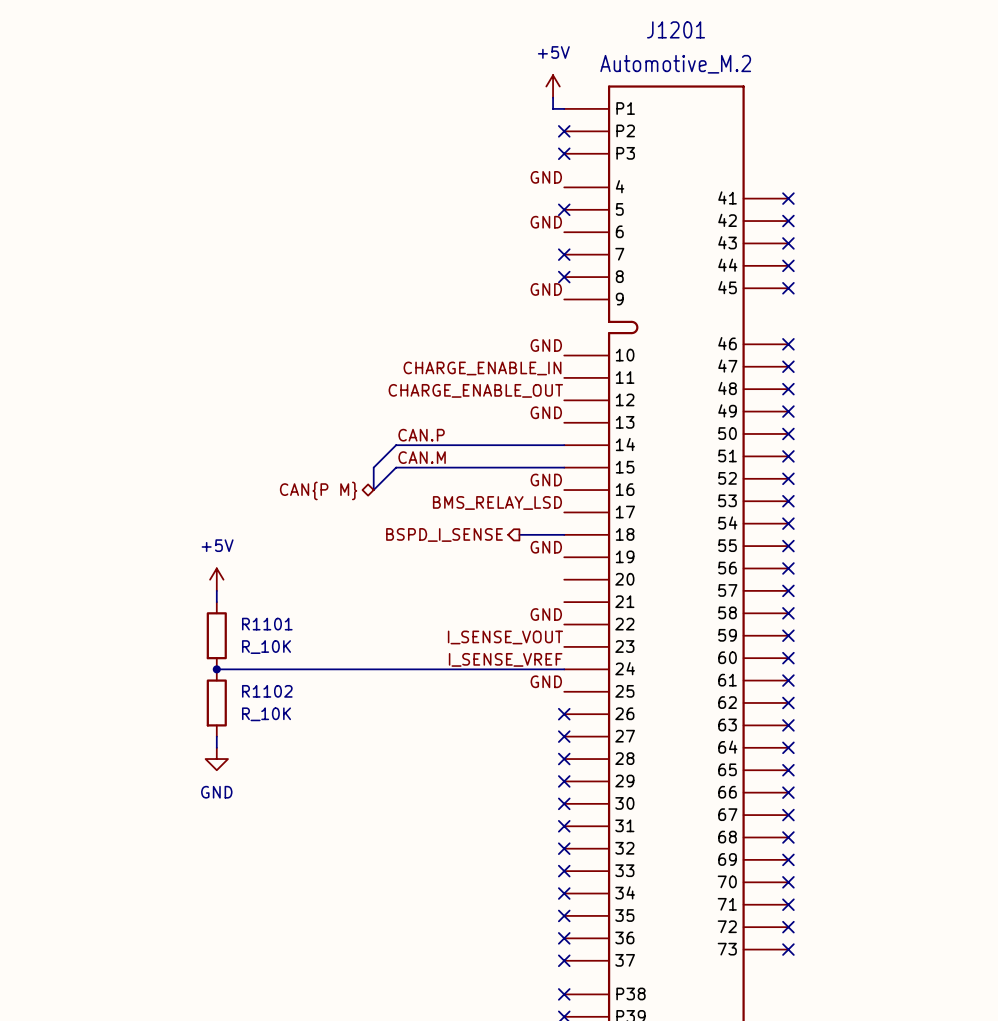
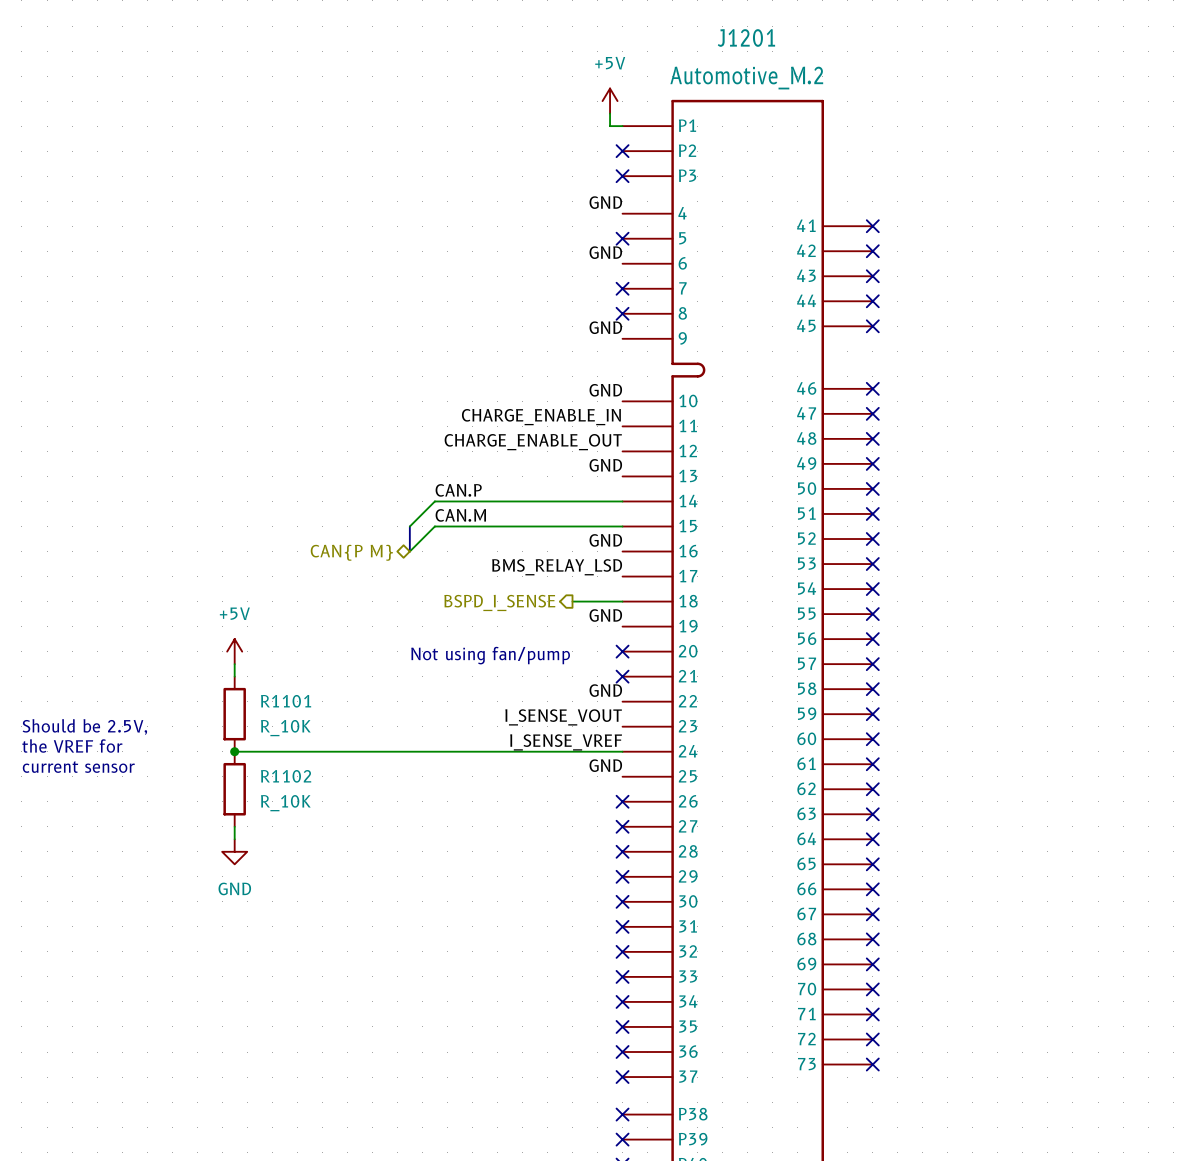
no-connect mark: none -> (622, 651)
text: none -> Not using fan/pump (490, 655)
no-connect mark: none -> (622, 676)
text: none -> Should be 2.5V, (84, 727)
text: none -> the VREF for (72, 746)
text: none -> current sensor (78, 766)

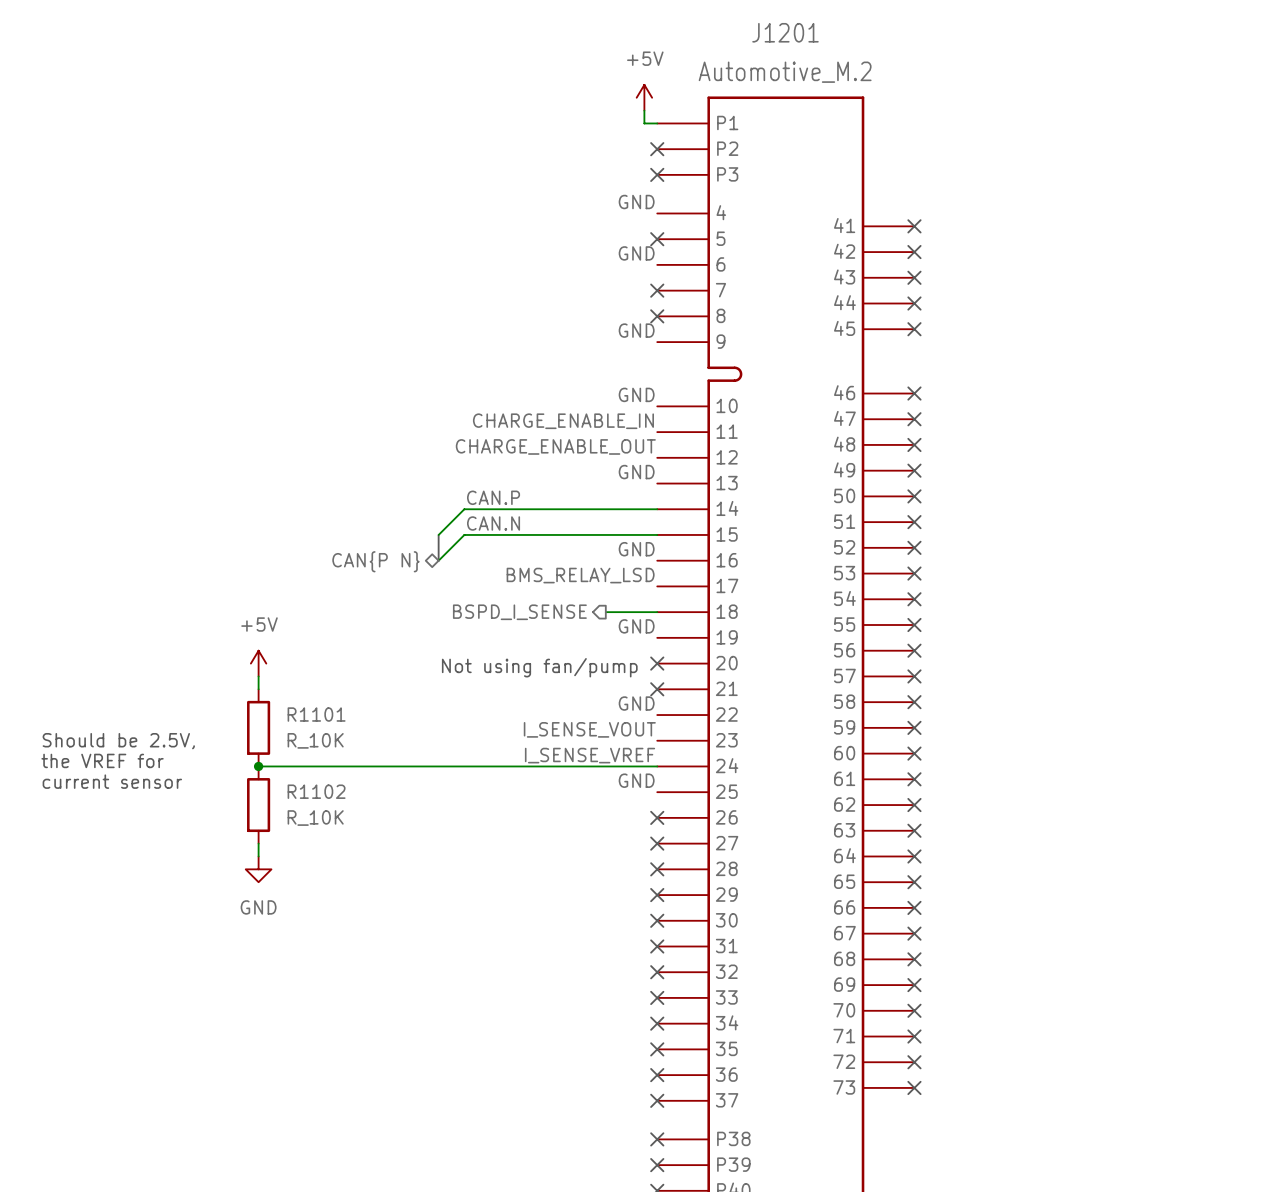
label: CAN.M (460, 515) -> CAN.N (493, 523)
hierarchical label: CAN{P M} (351, 552) -> CAN{P N} (375, 561)

